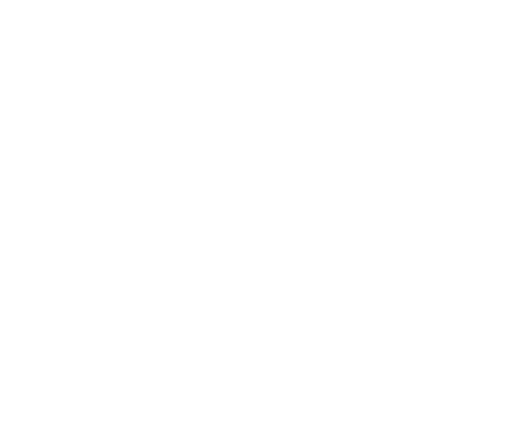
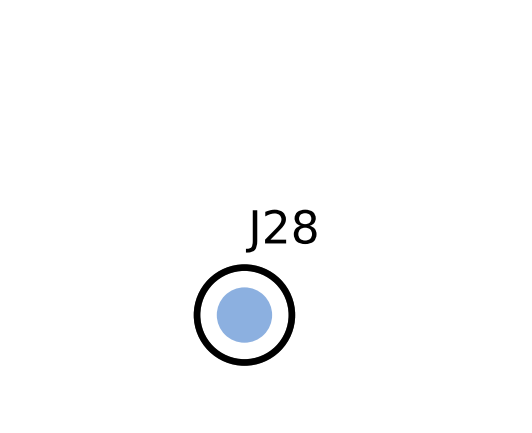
J28: none -> (244, 315)

